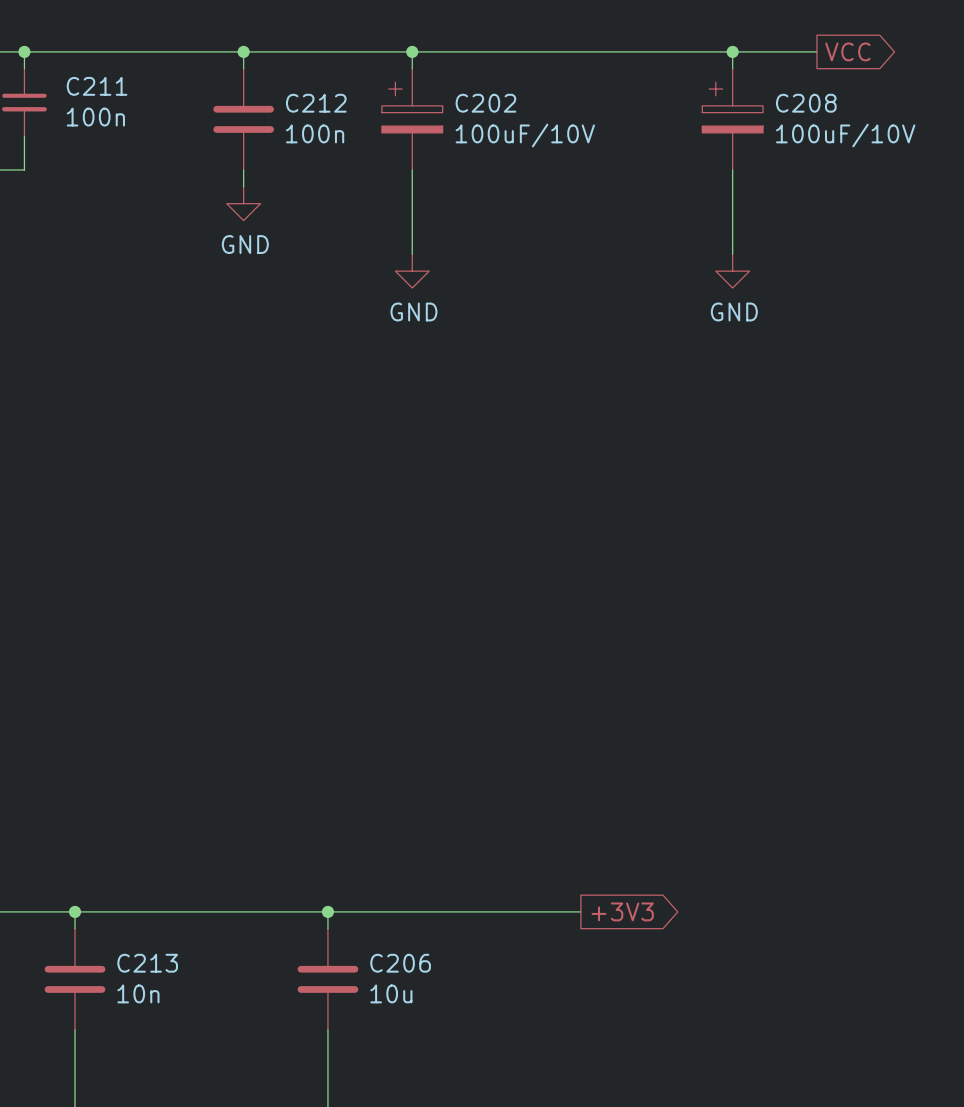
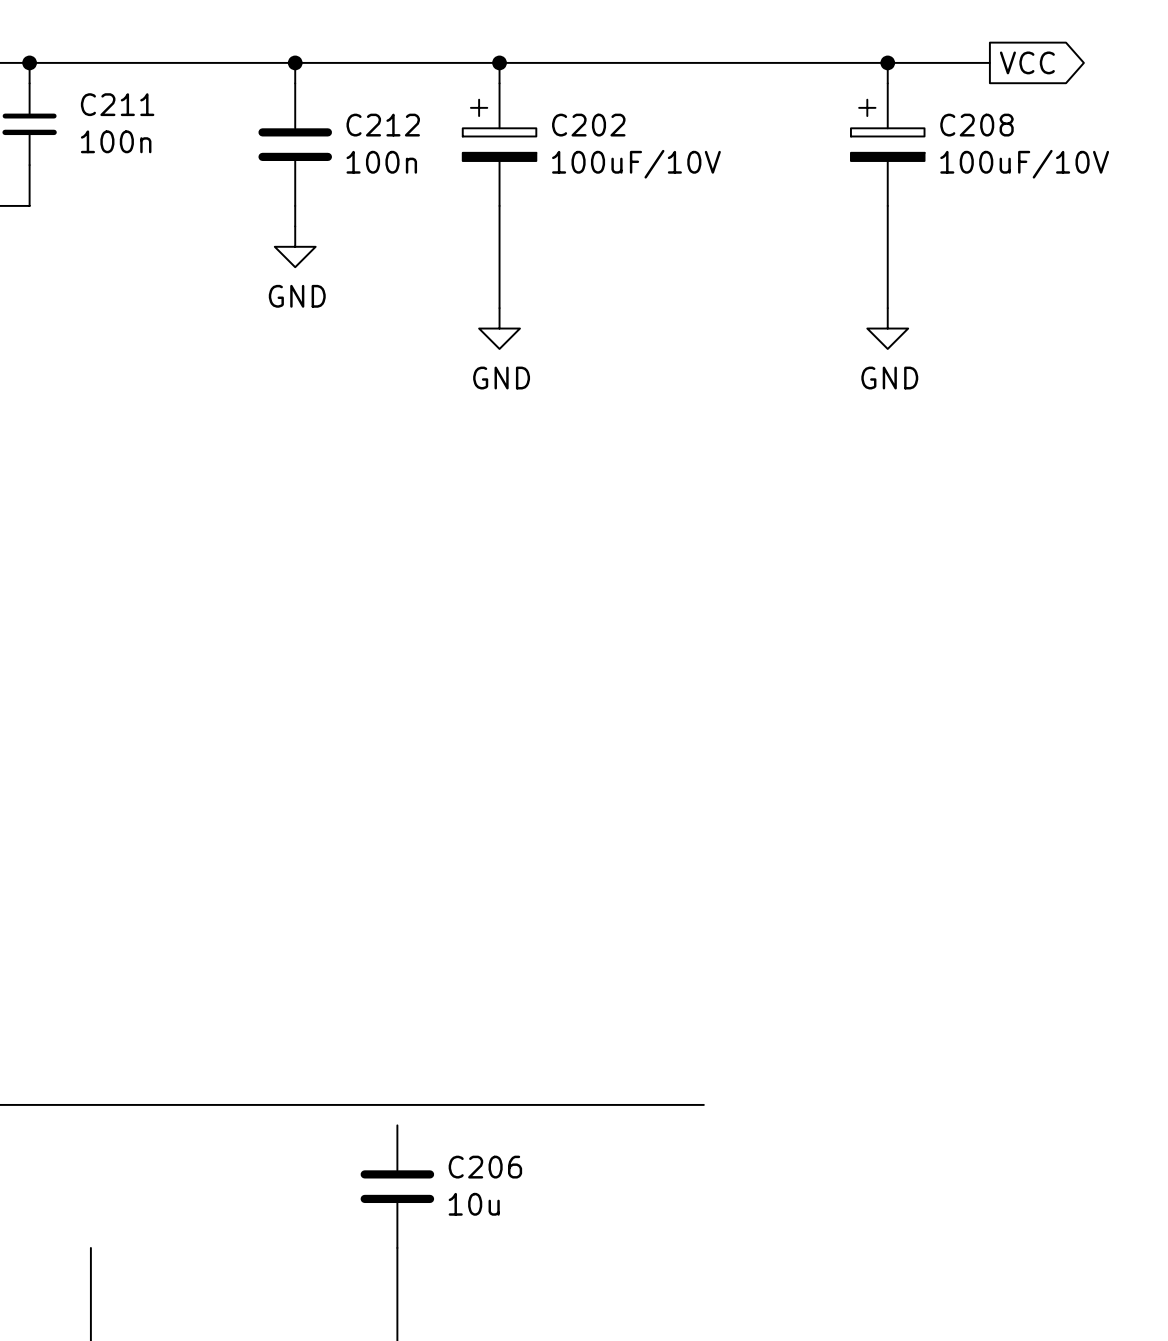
wire: (75, 911) (75, 928) -> none
junction: (75, 911) -> none
wire: (327, 911) (327, 928) -> none
junction: (327, 911) -> none
global label: +3V3 (622, 911) -> none
C213: 10n (75, 979) -> none

